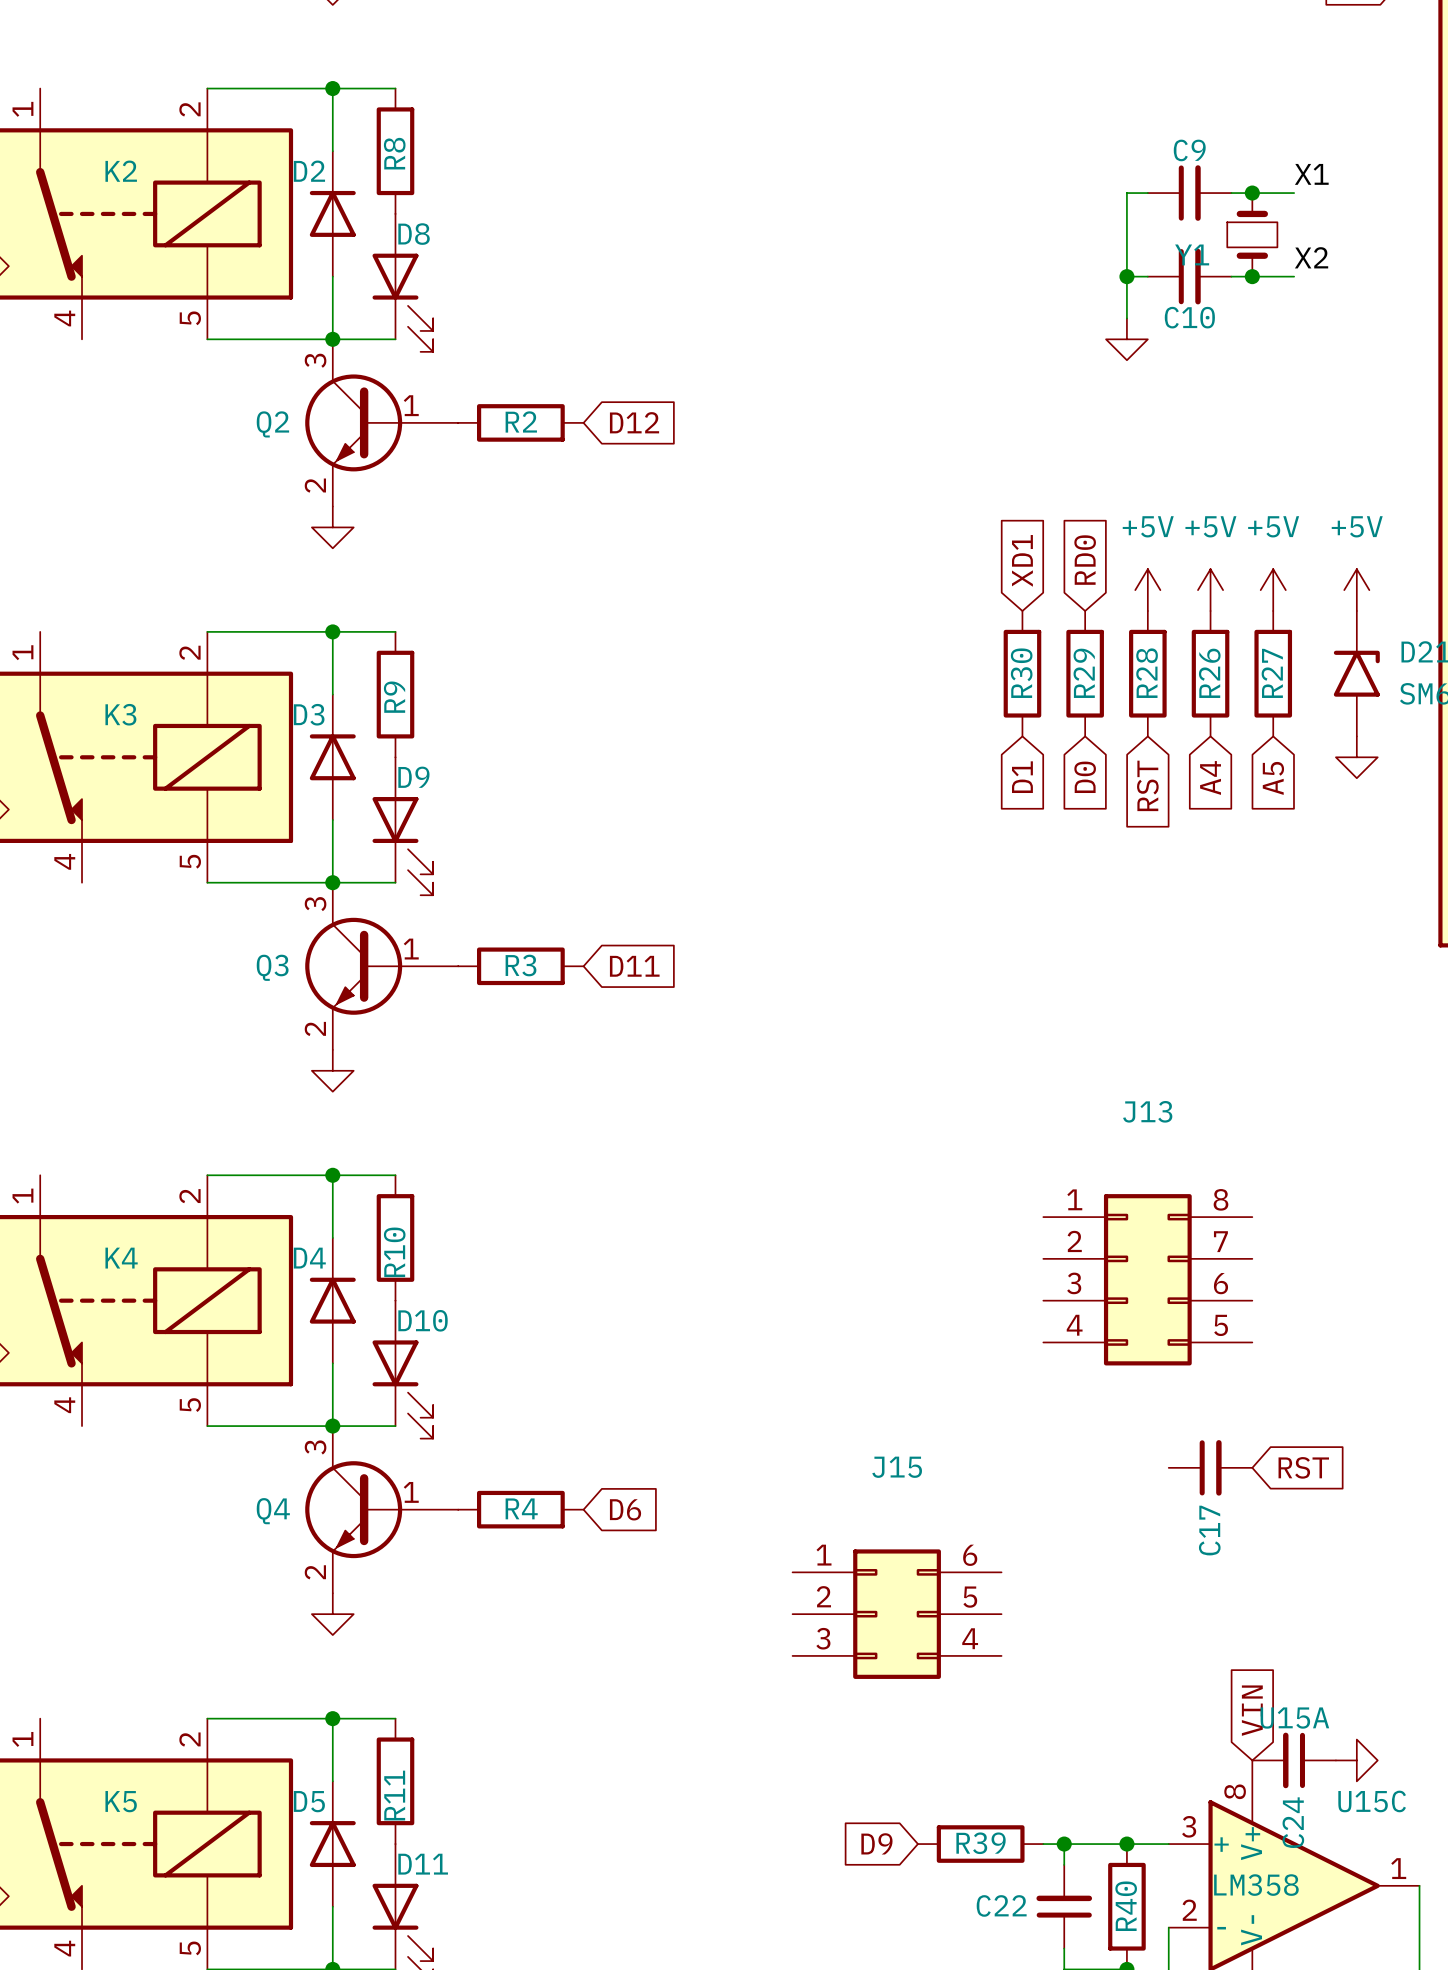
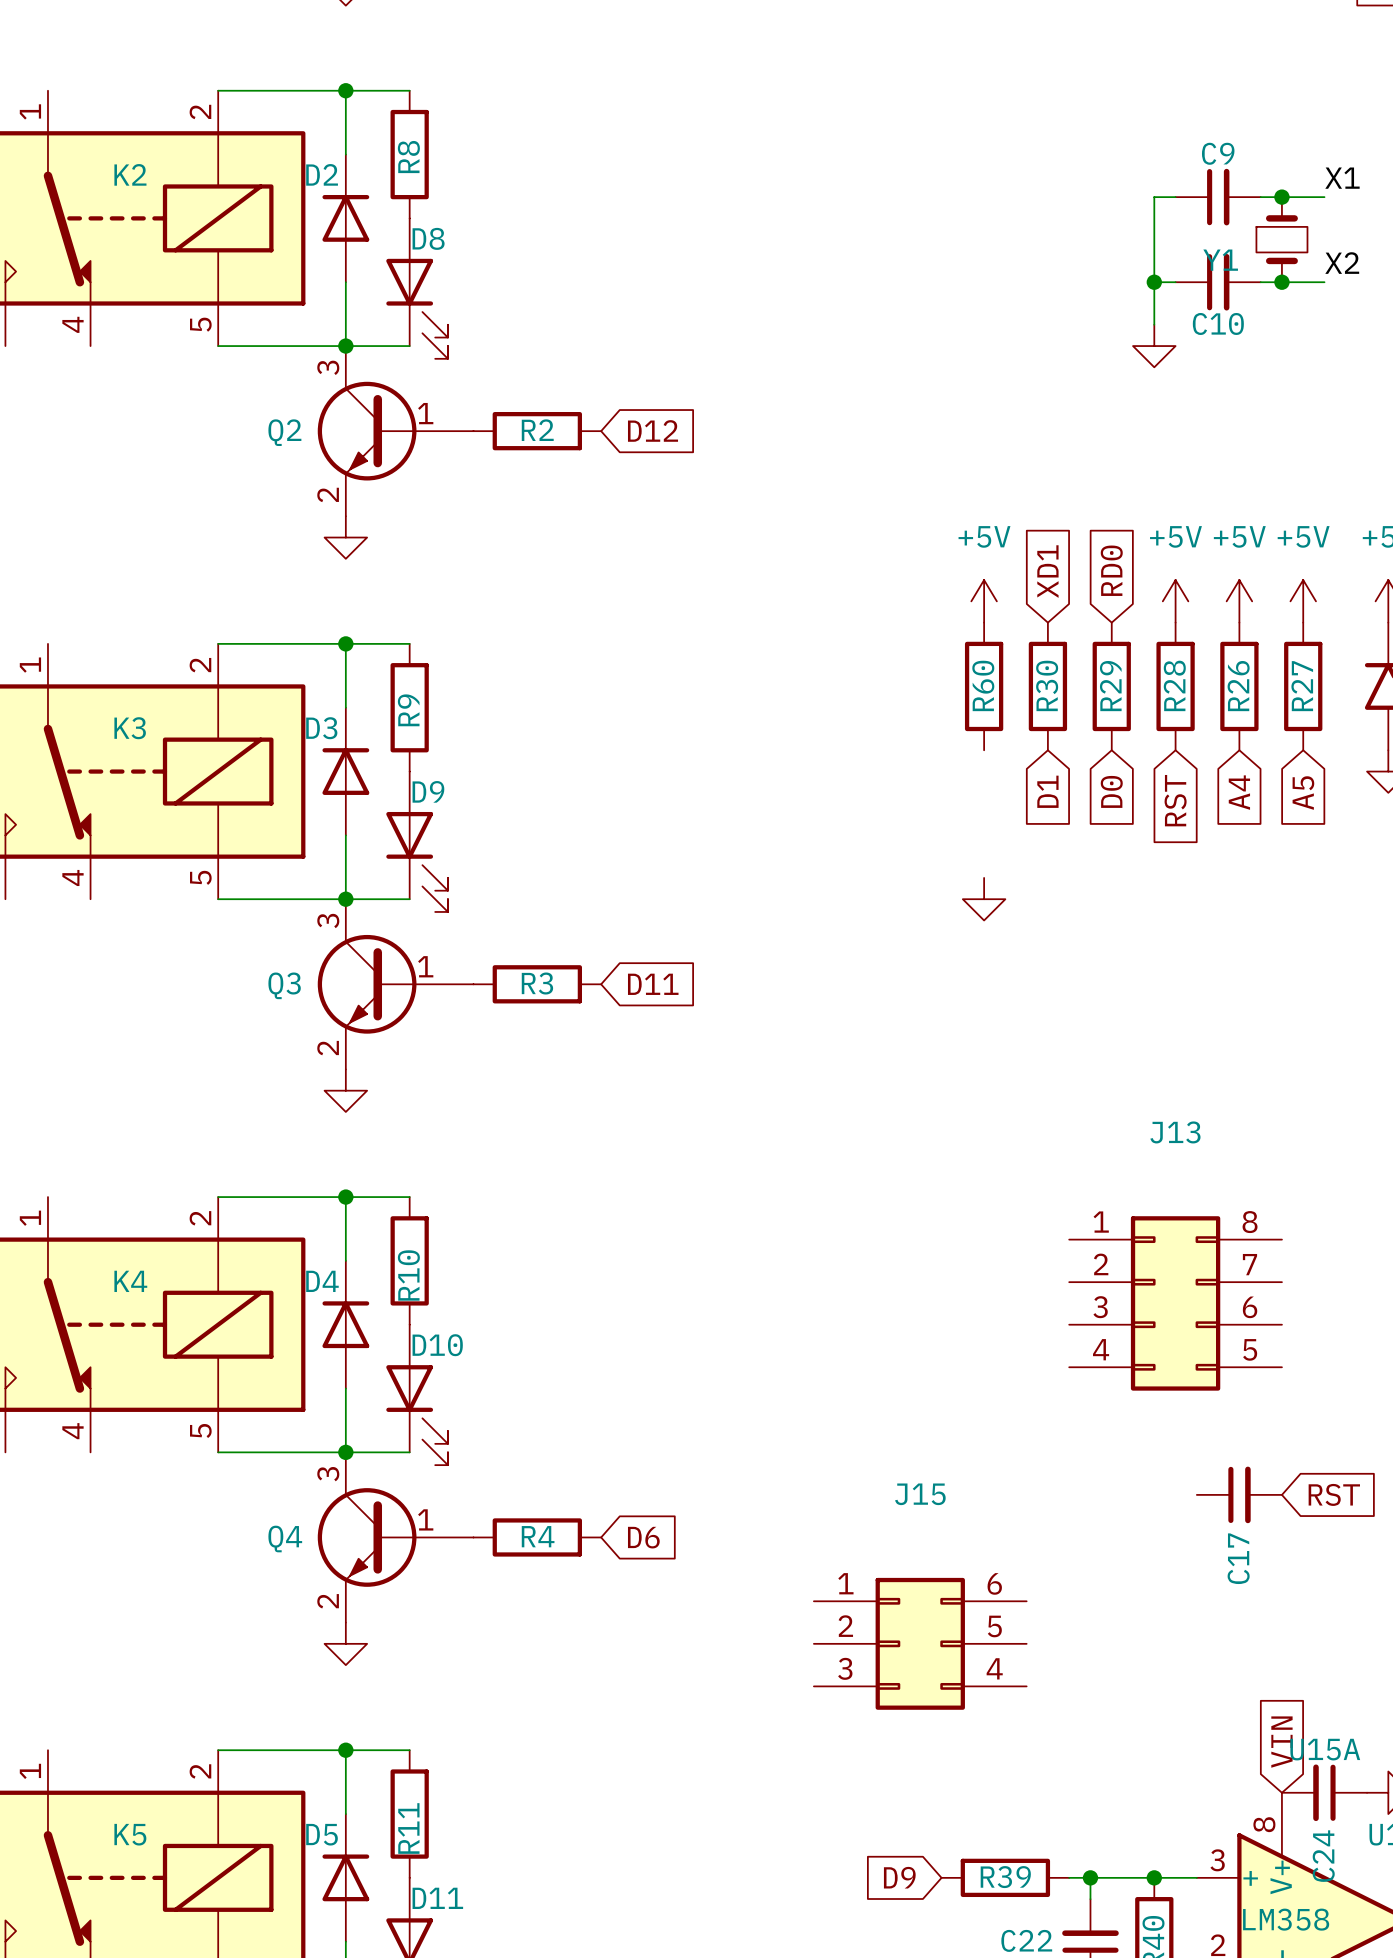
power symbol: none -> +5V (984, 601)
R60: none -> (984, 686)
power symbol: none -> (984, 899)

